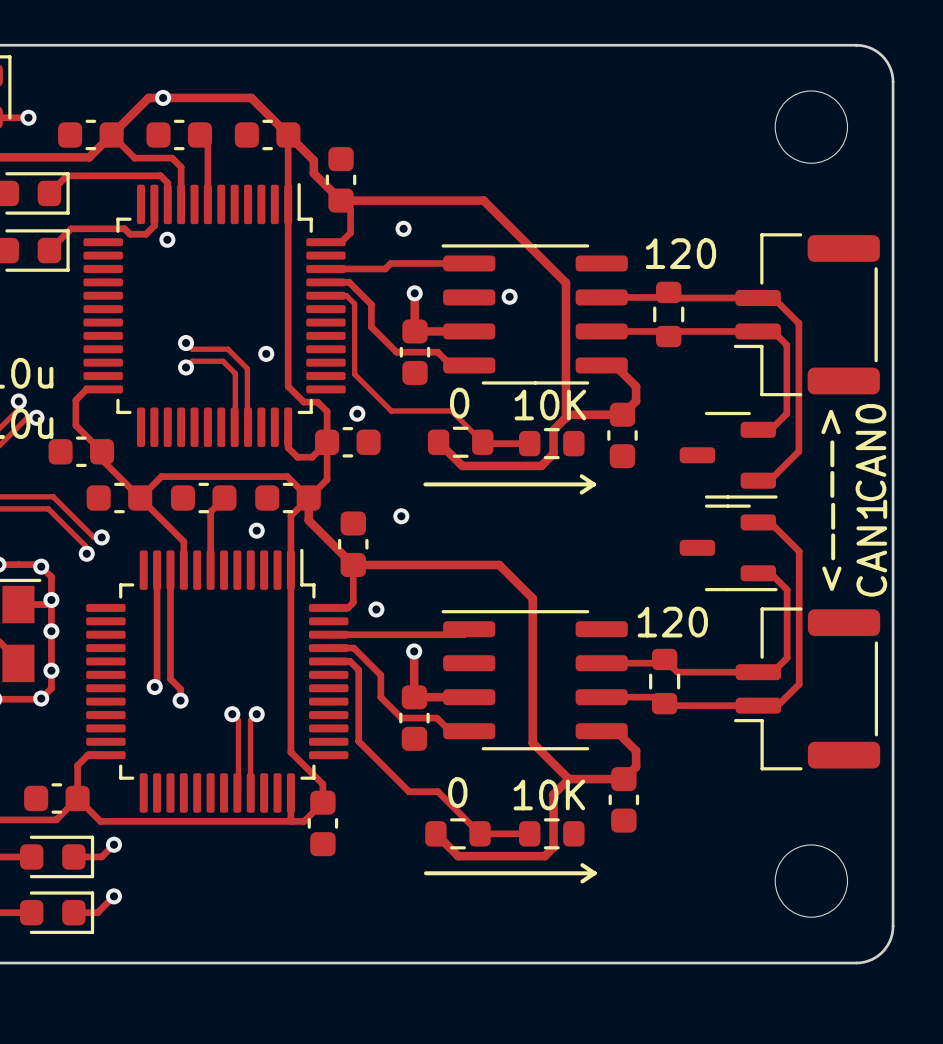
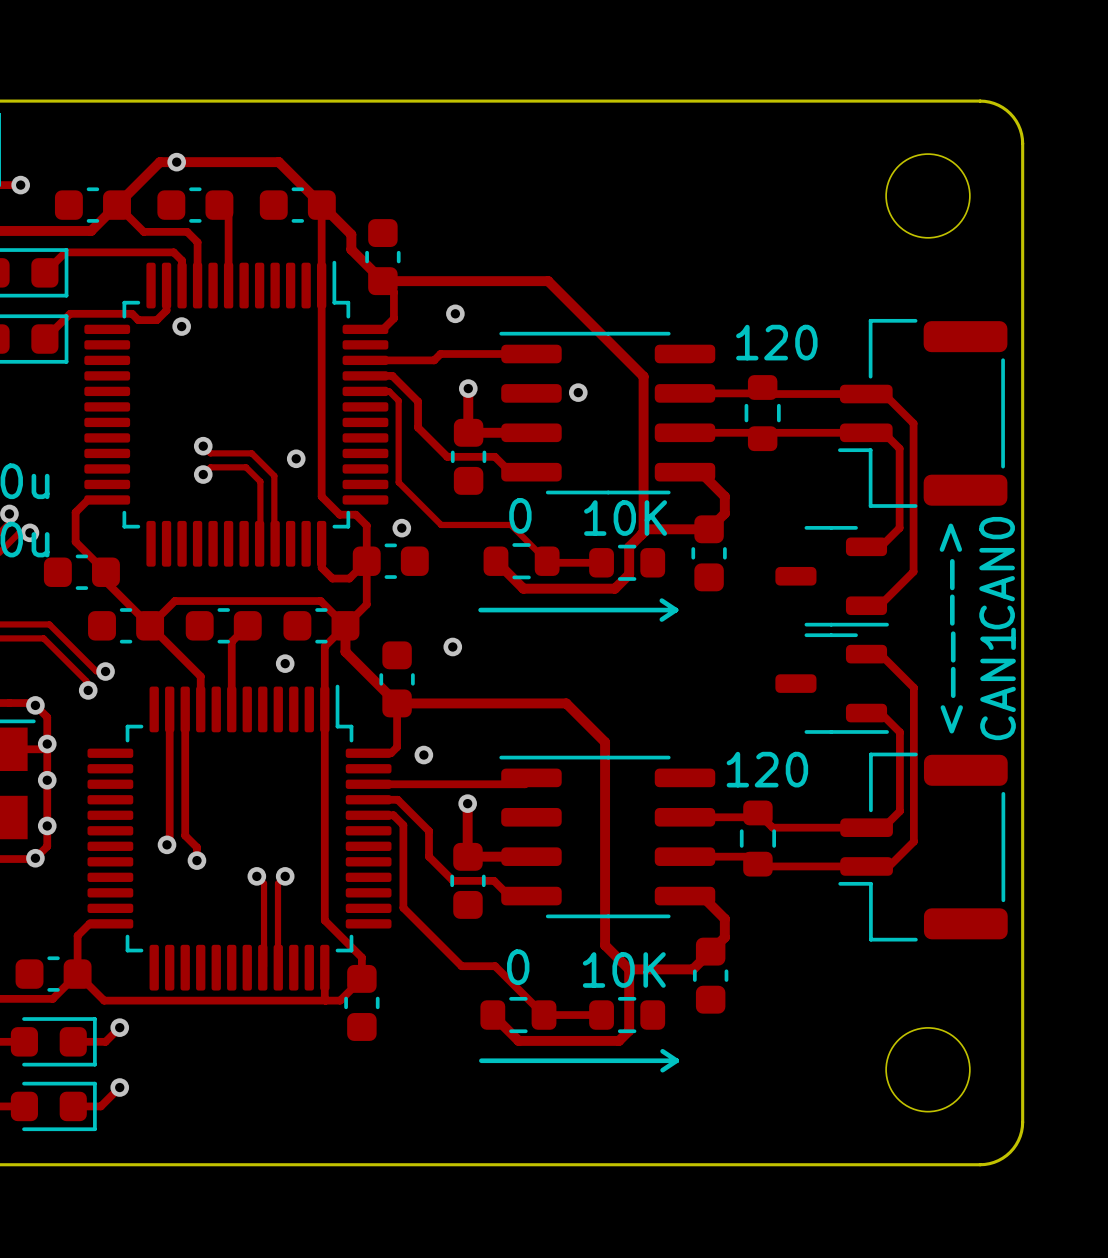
track: (532, 742) (568, 779) -> none
track: (568, 779) (623, 779) -> (605, 909) (605, 945) (629, 969) (692, 969) (710, 951)
track: (568, 779) (553, 794) -> none

